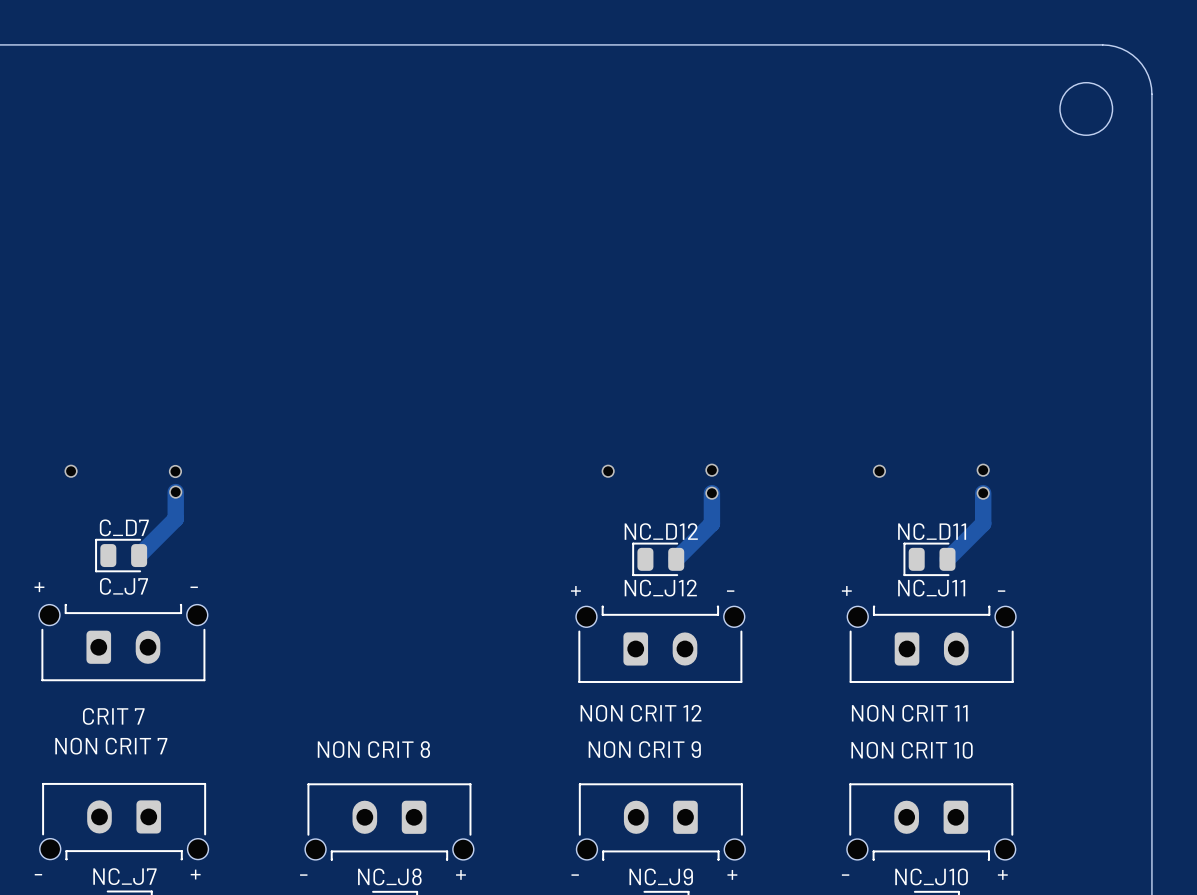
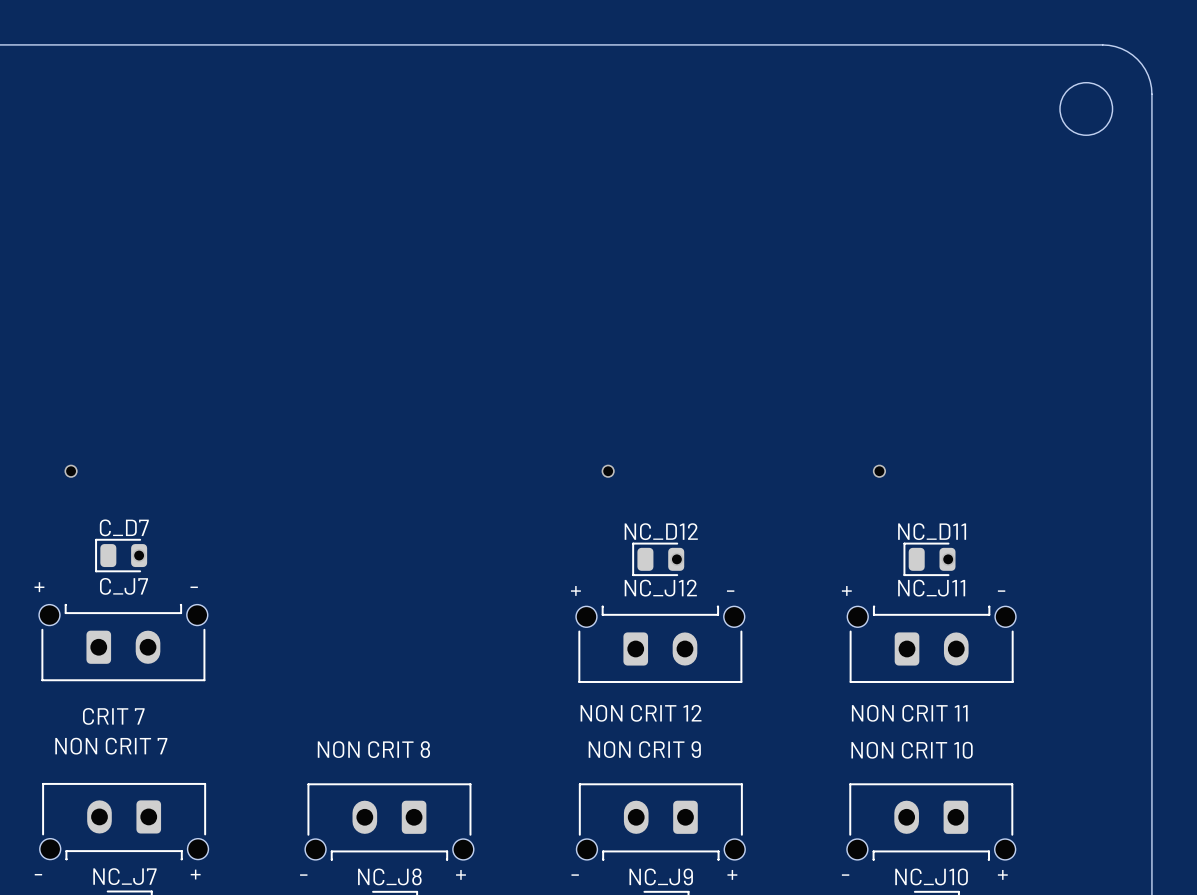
via: (711, 470) -> none
via: (983, 470) -> none
via: (175, 471) -> none
track: (175, 492) (175, 518) (139, 555) -> none
via: (175, 492) -> none
track: (711, 493) (711, 523) (676, 559) -> none
via: (711, 493) -> none
track: (983, 493) (983, 523) (947, 559) -> none
via: (983, 493) -> none
via: none -> (139, 555)
via: none -> (676, 559)
via: none -> (948, 559)

